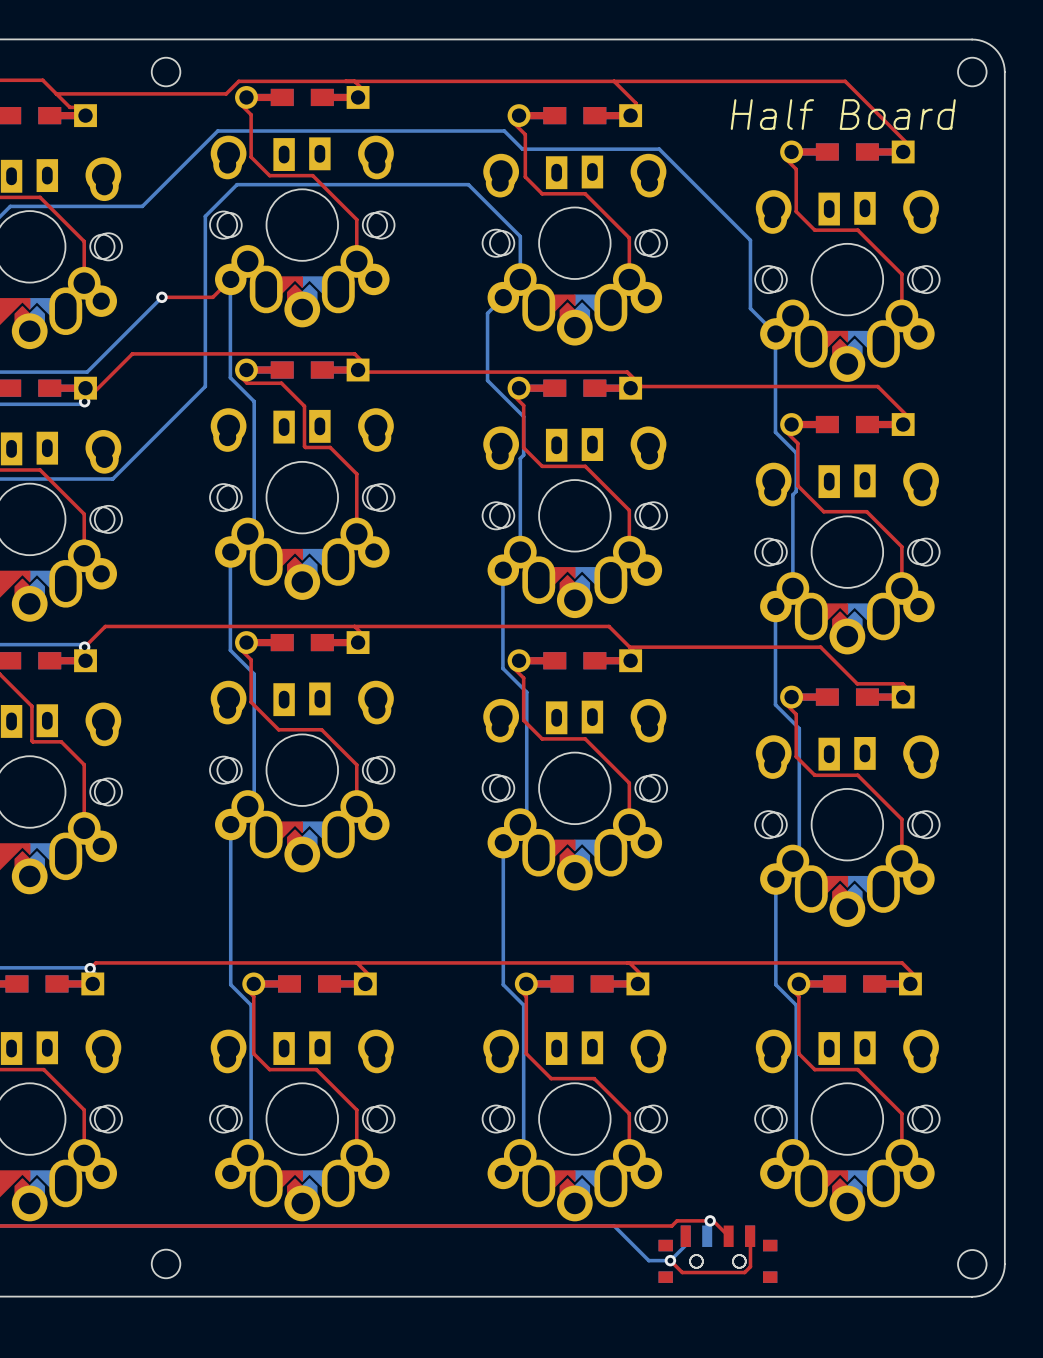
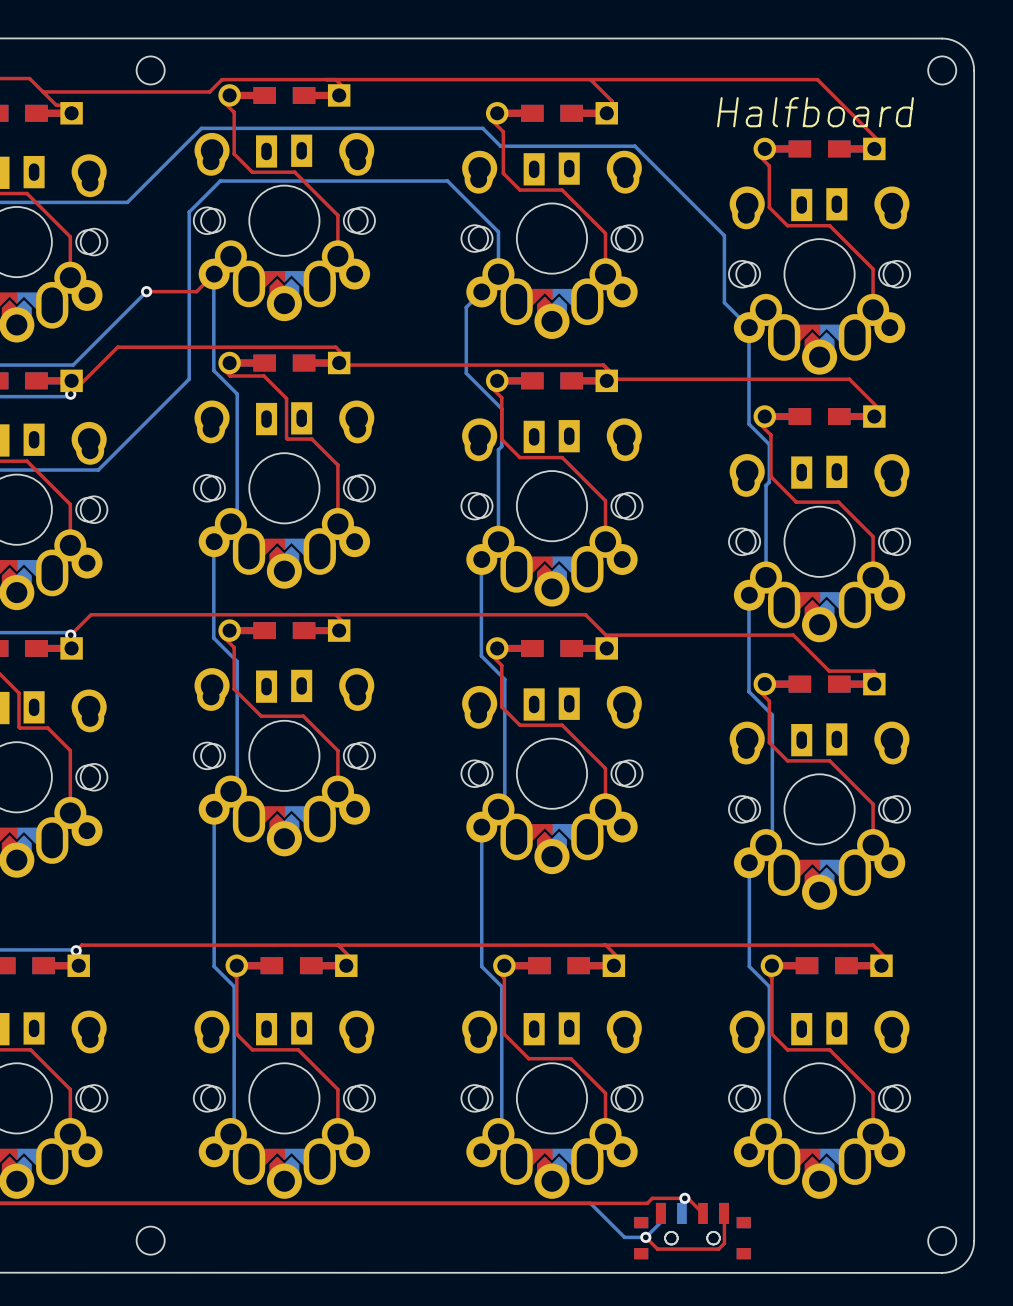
text: Half Board (843, 114) -> Halfboard (815, 112)

